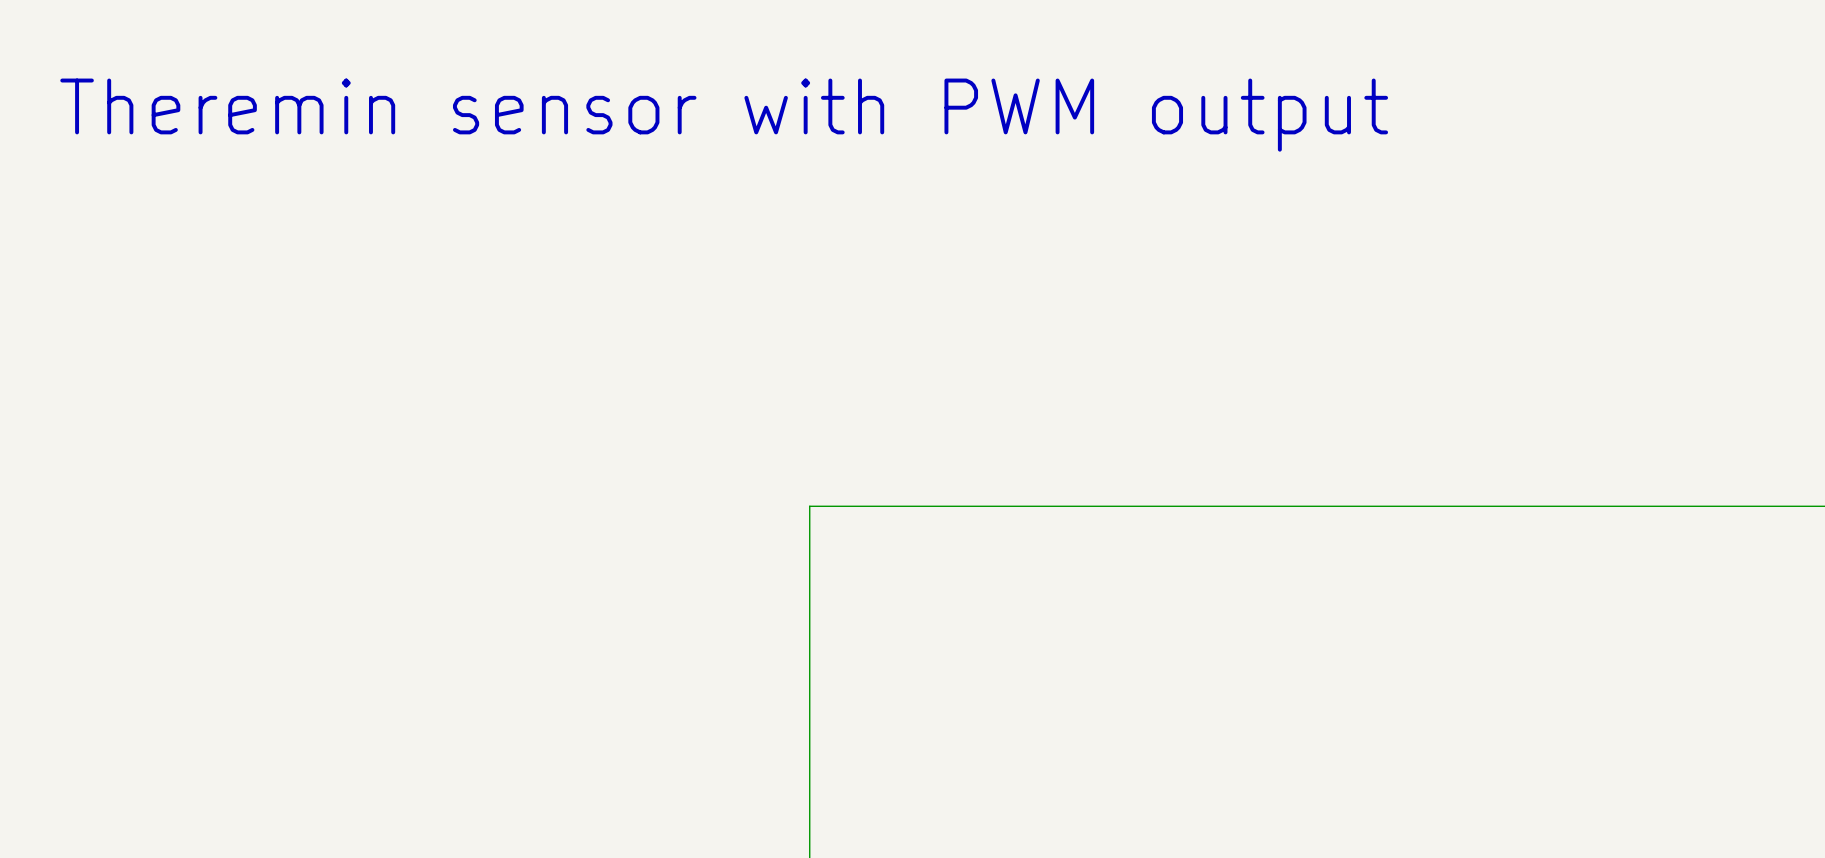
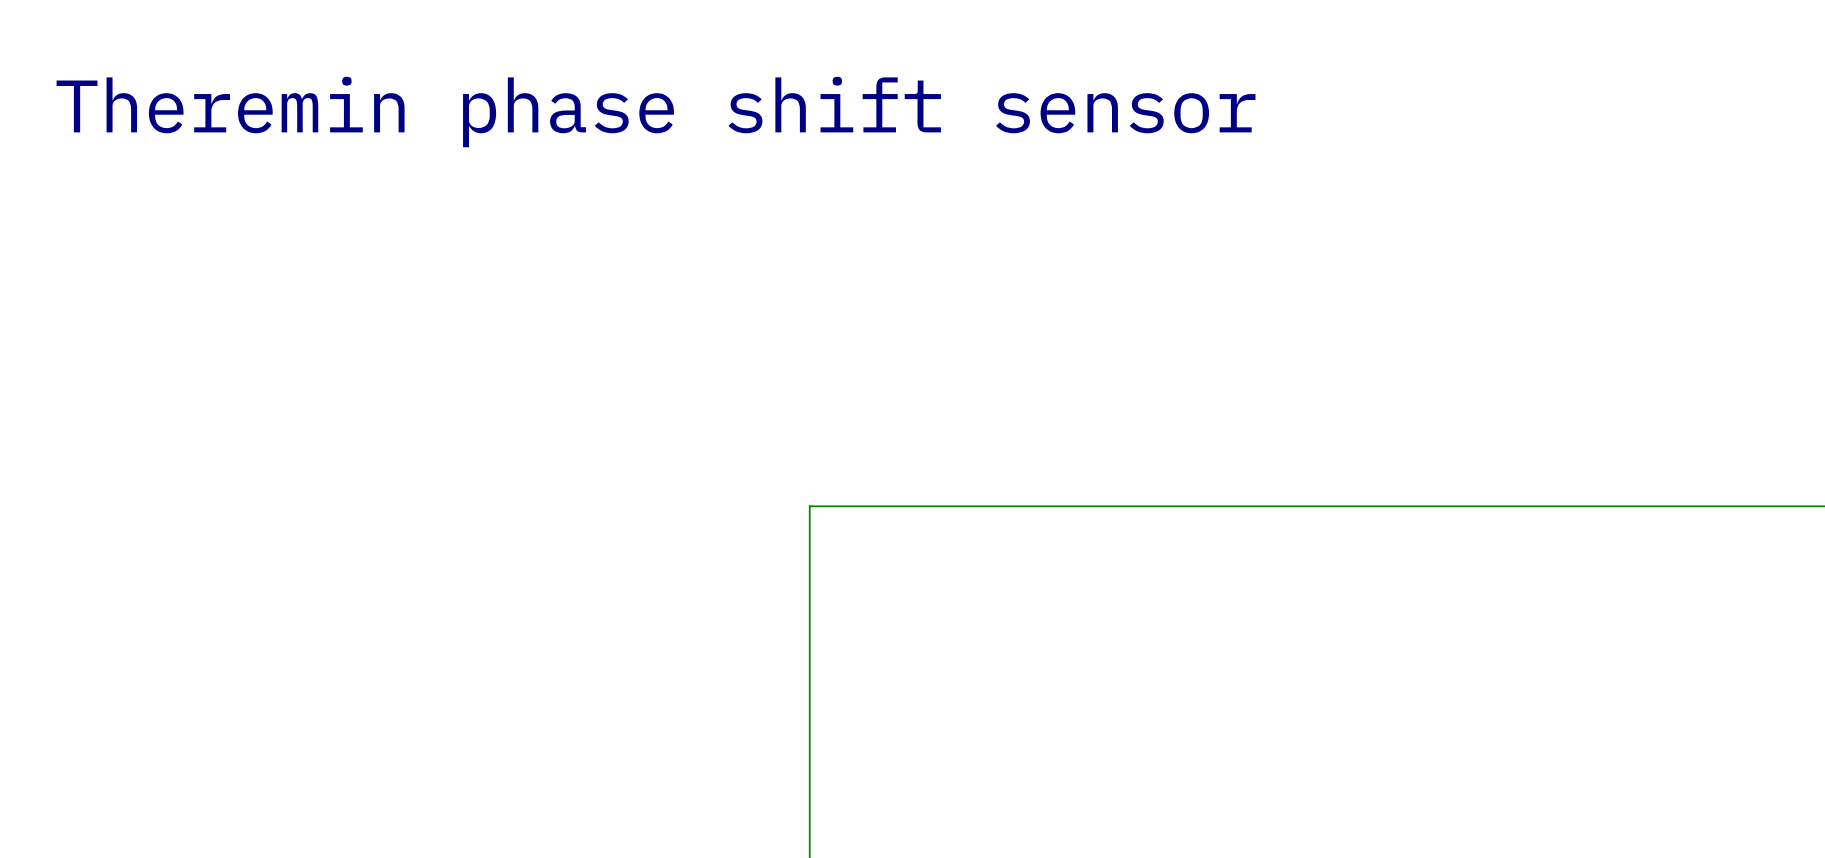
text: Theremin sensor with PWM output (724, 115) -> Theremin phase shift sensor (656, 112)

